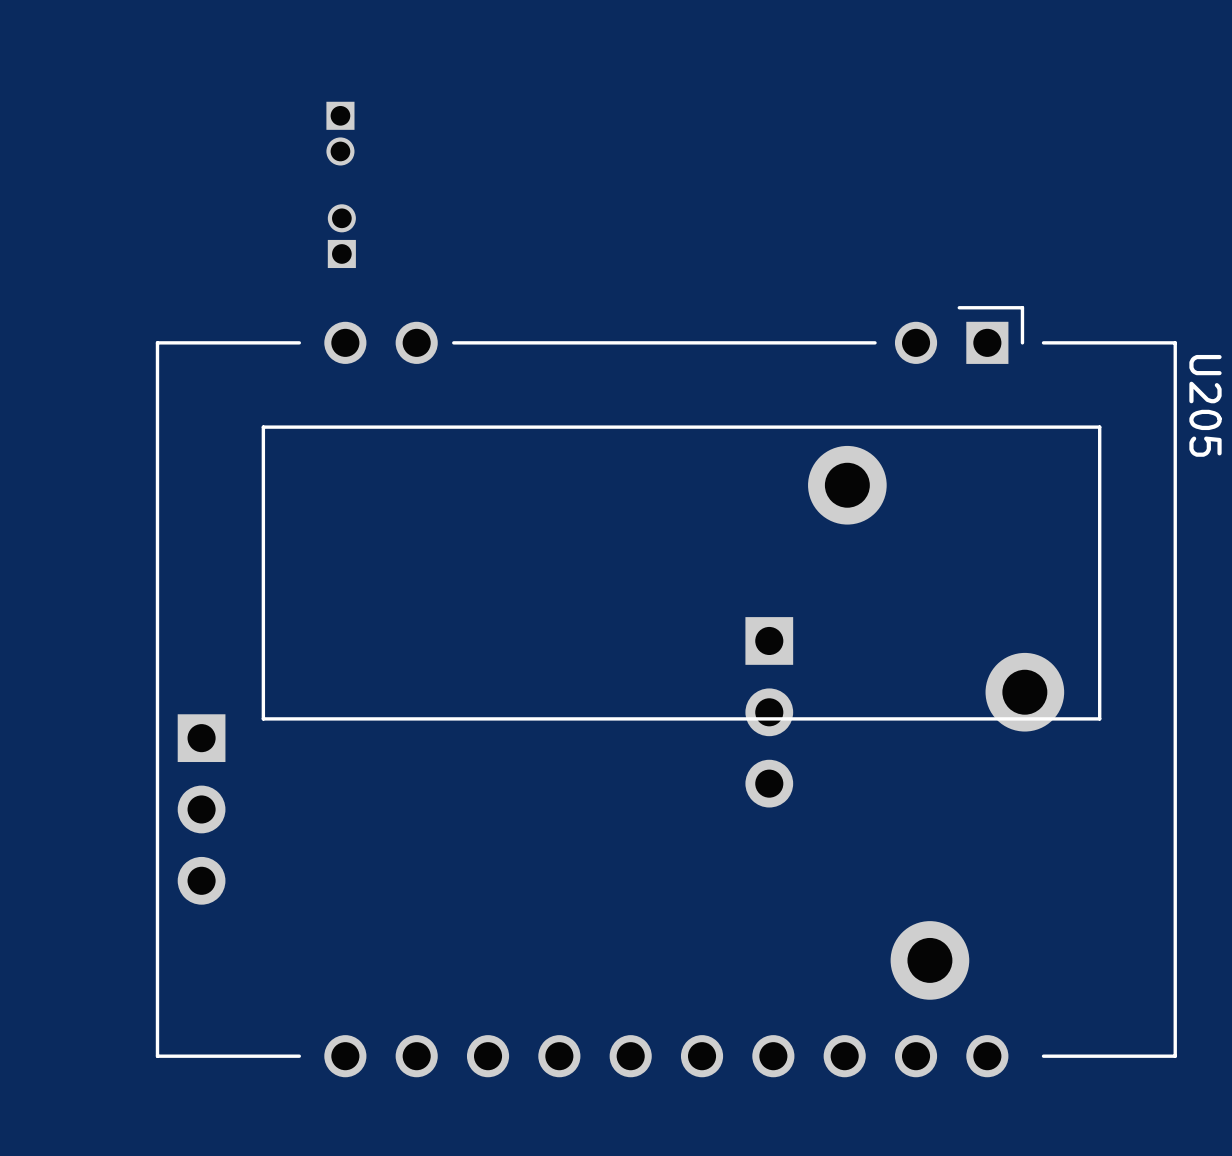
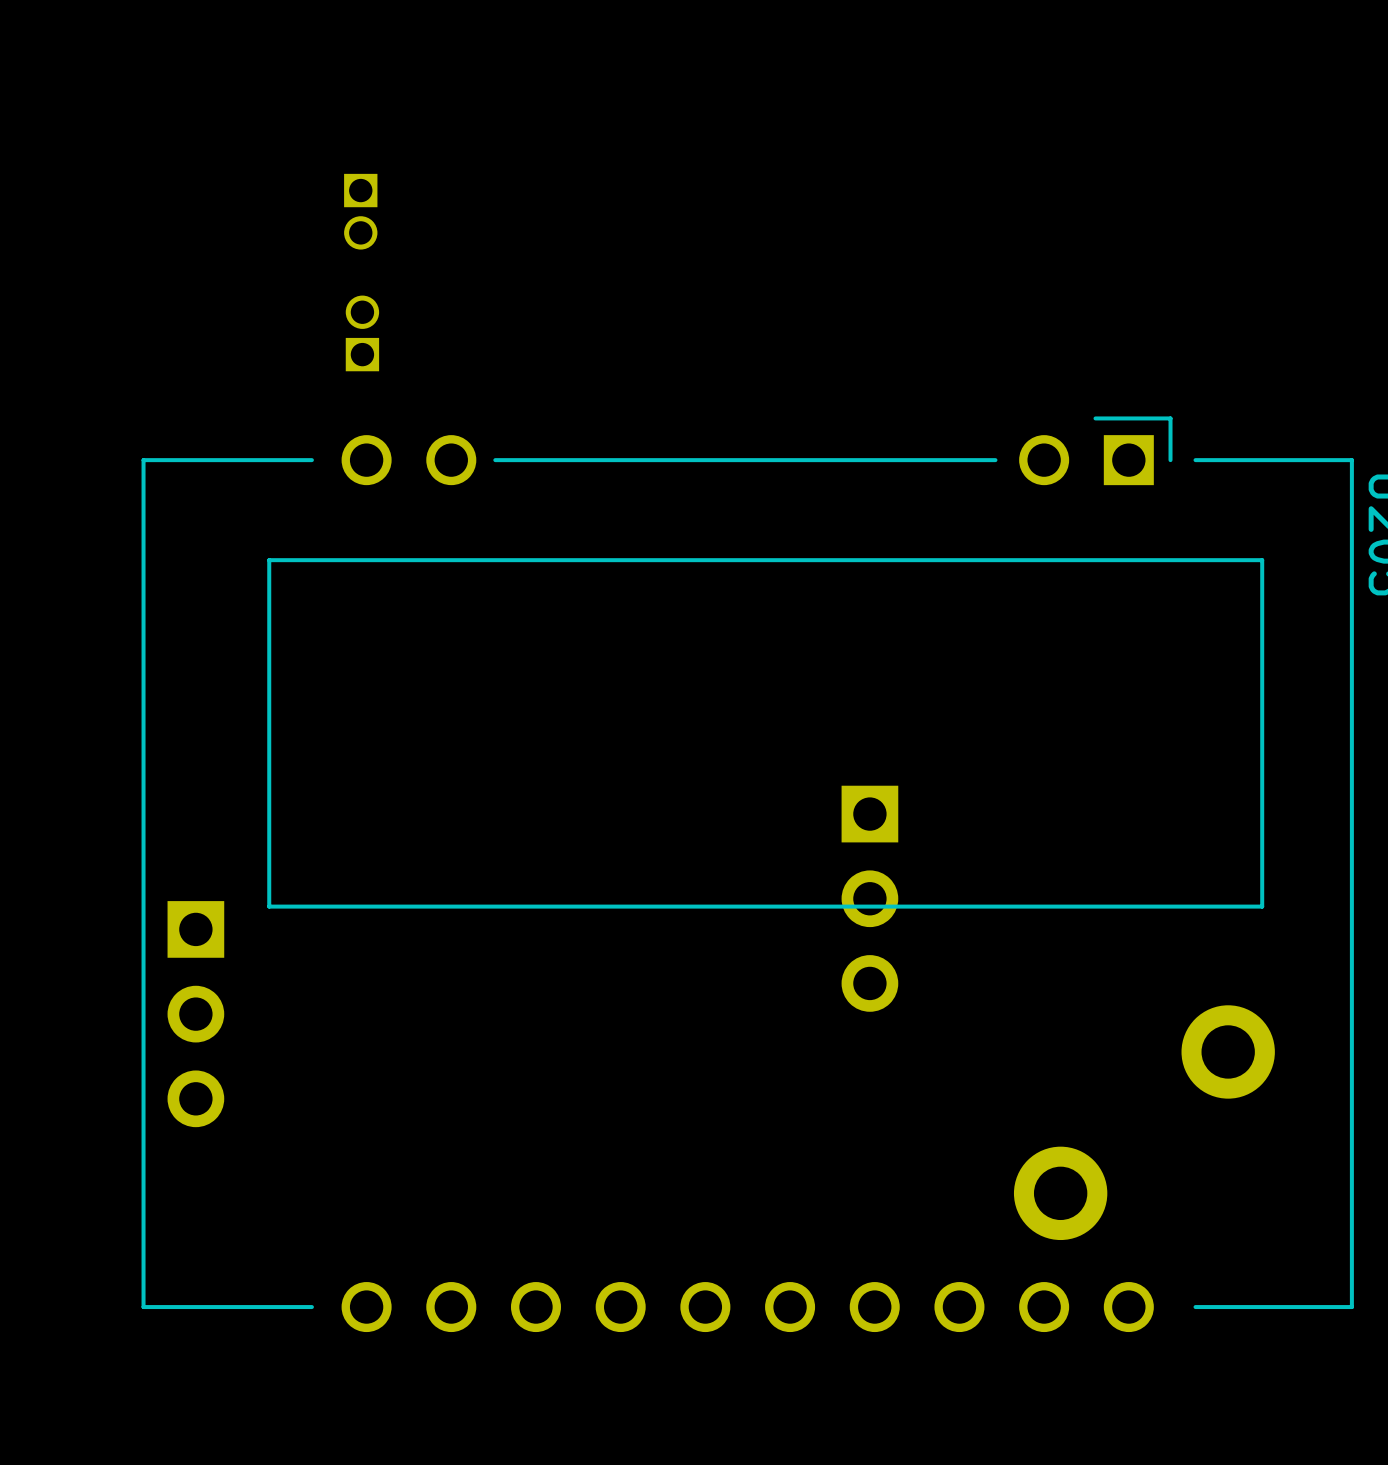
part: (847, 485) -> none
part position: (1024, 692) -> (1228, 1051)

